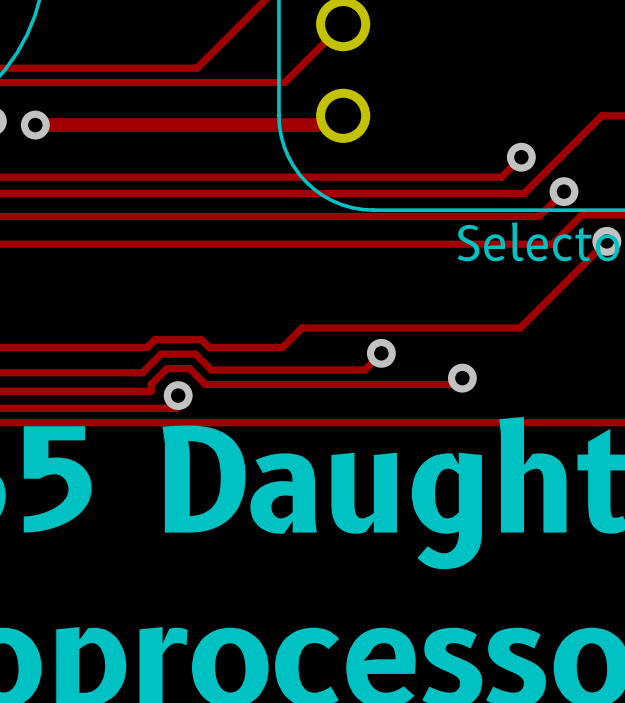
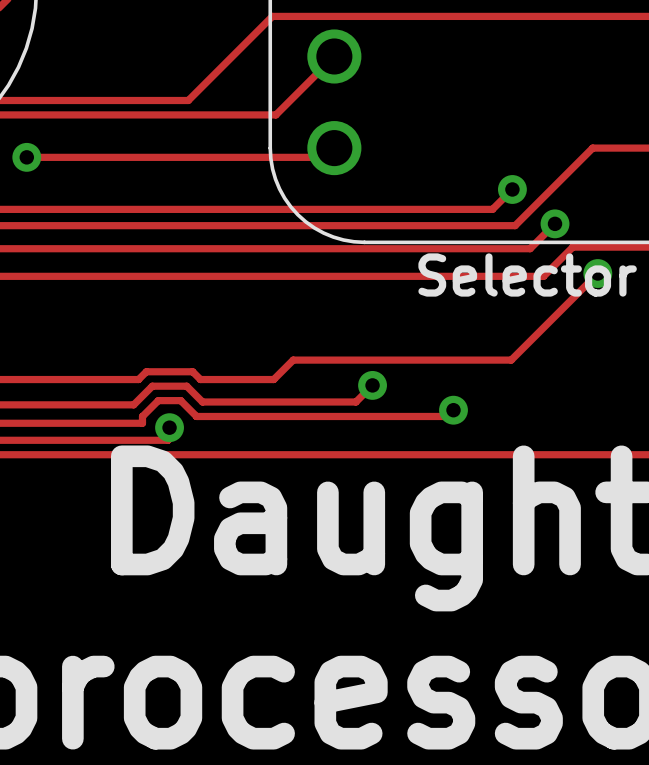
track width: thick (35, 125) (333, 125) -> thin (26, 157) (325, 157)

